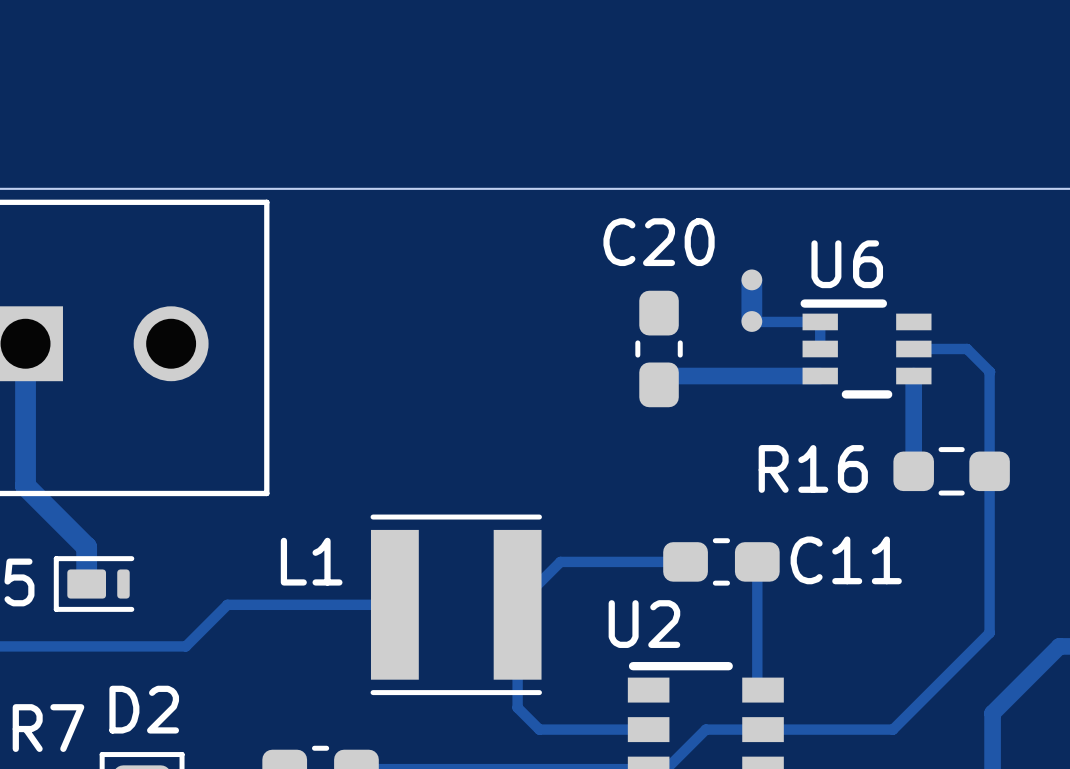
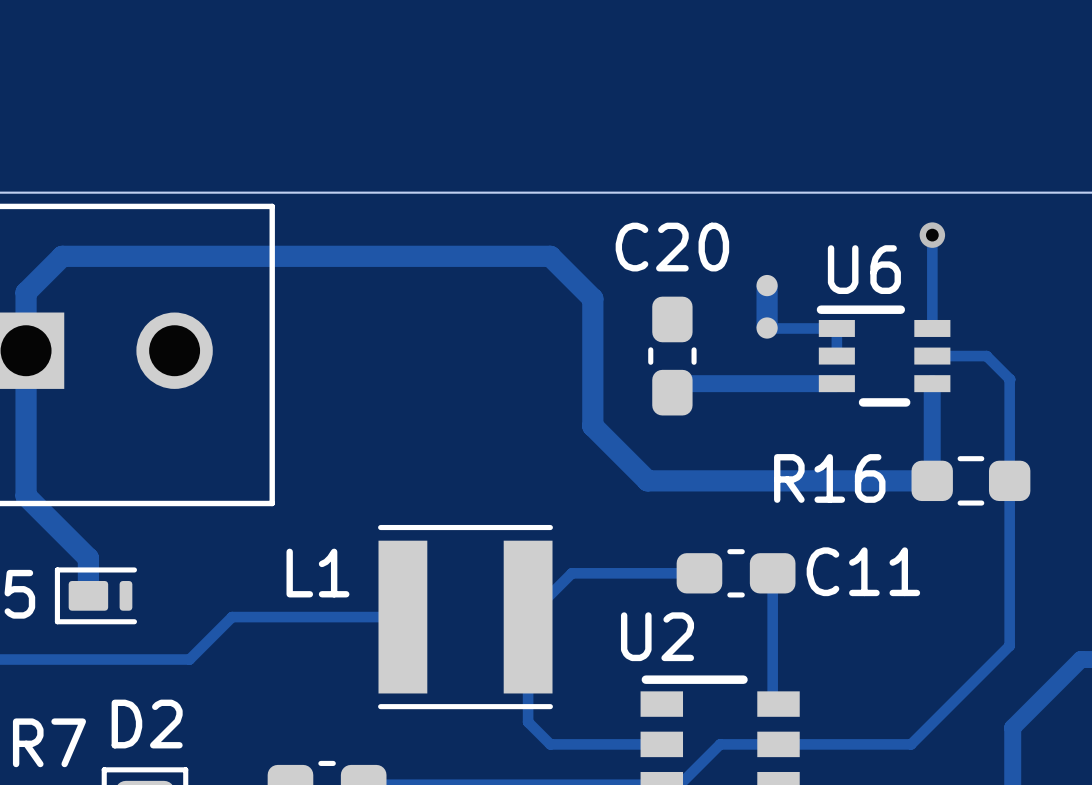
track: none -> (932, 235) (932, 328)
via: none -> (932, 235)
track: none -> (26, 350) (26, 292) (62, 256) (550, 256) (592, 298) (592, 426) (647, 480) (932, 480)

